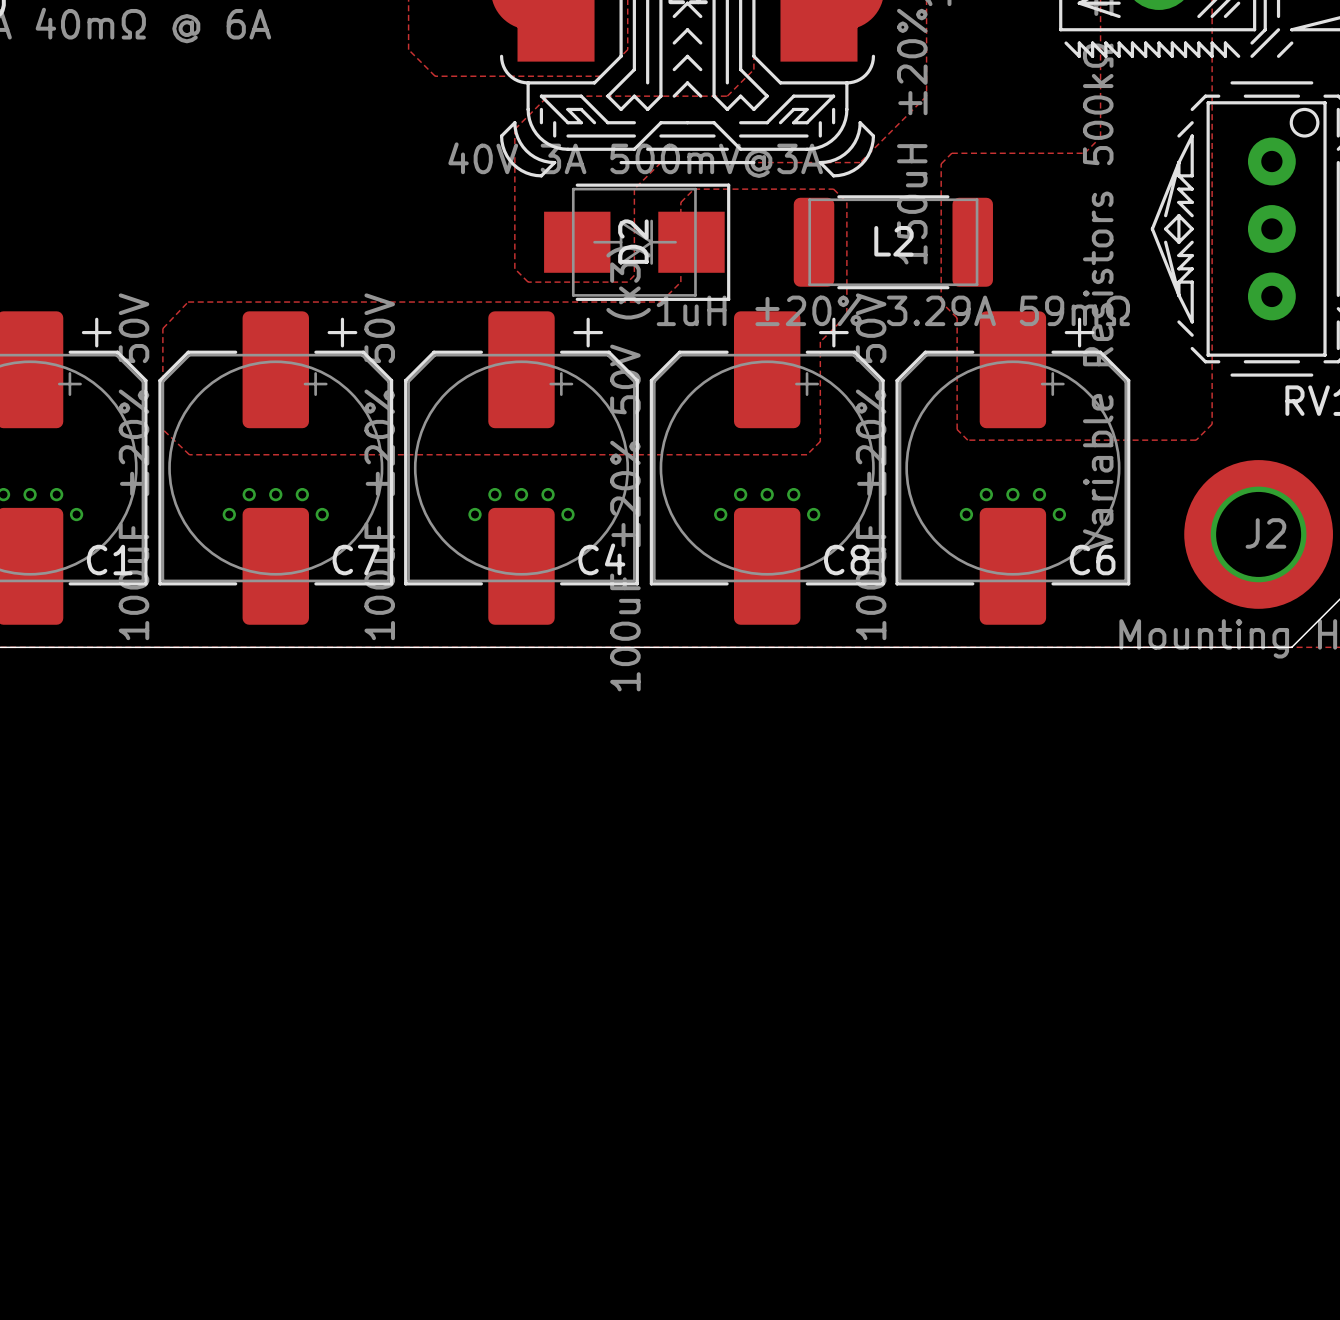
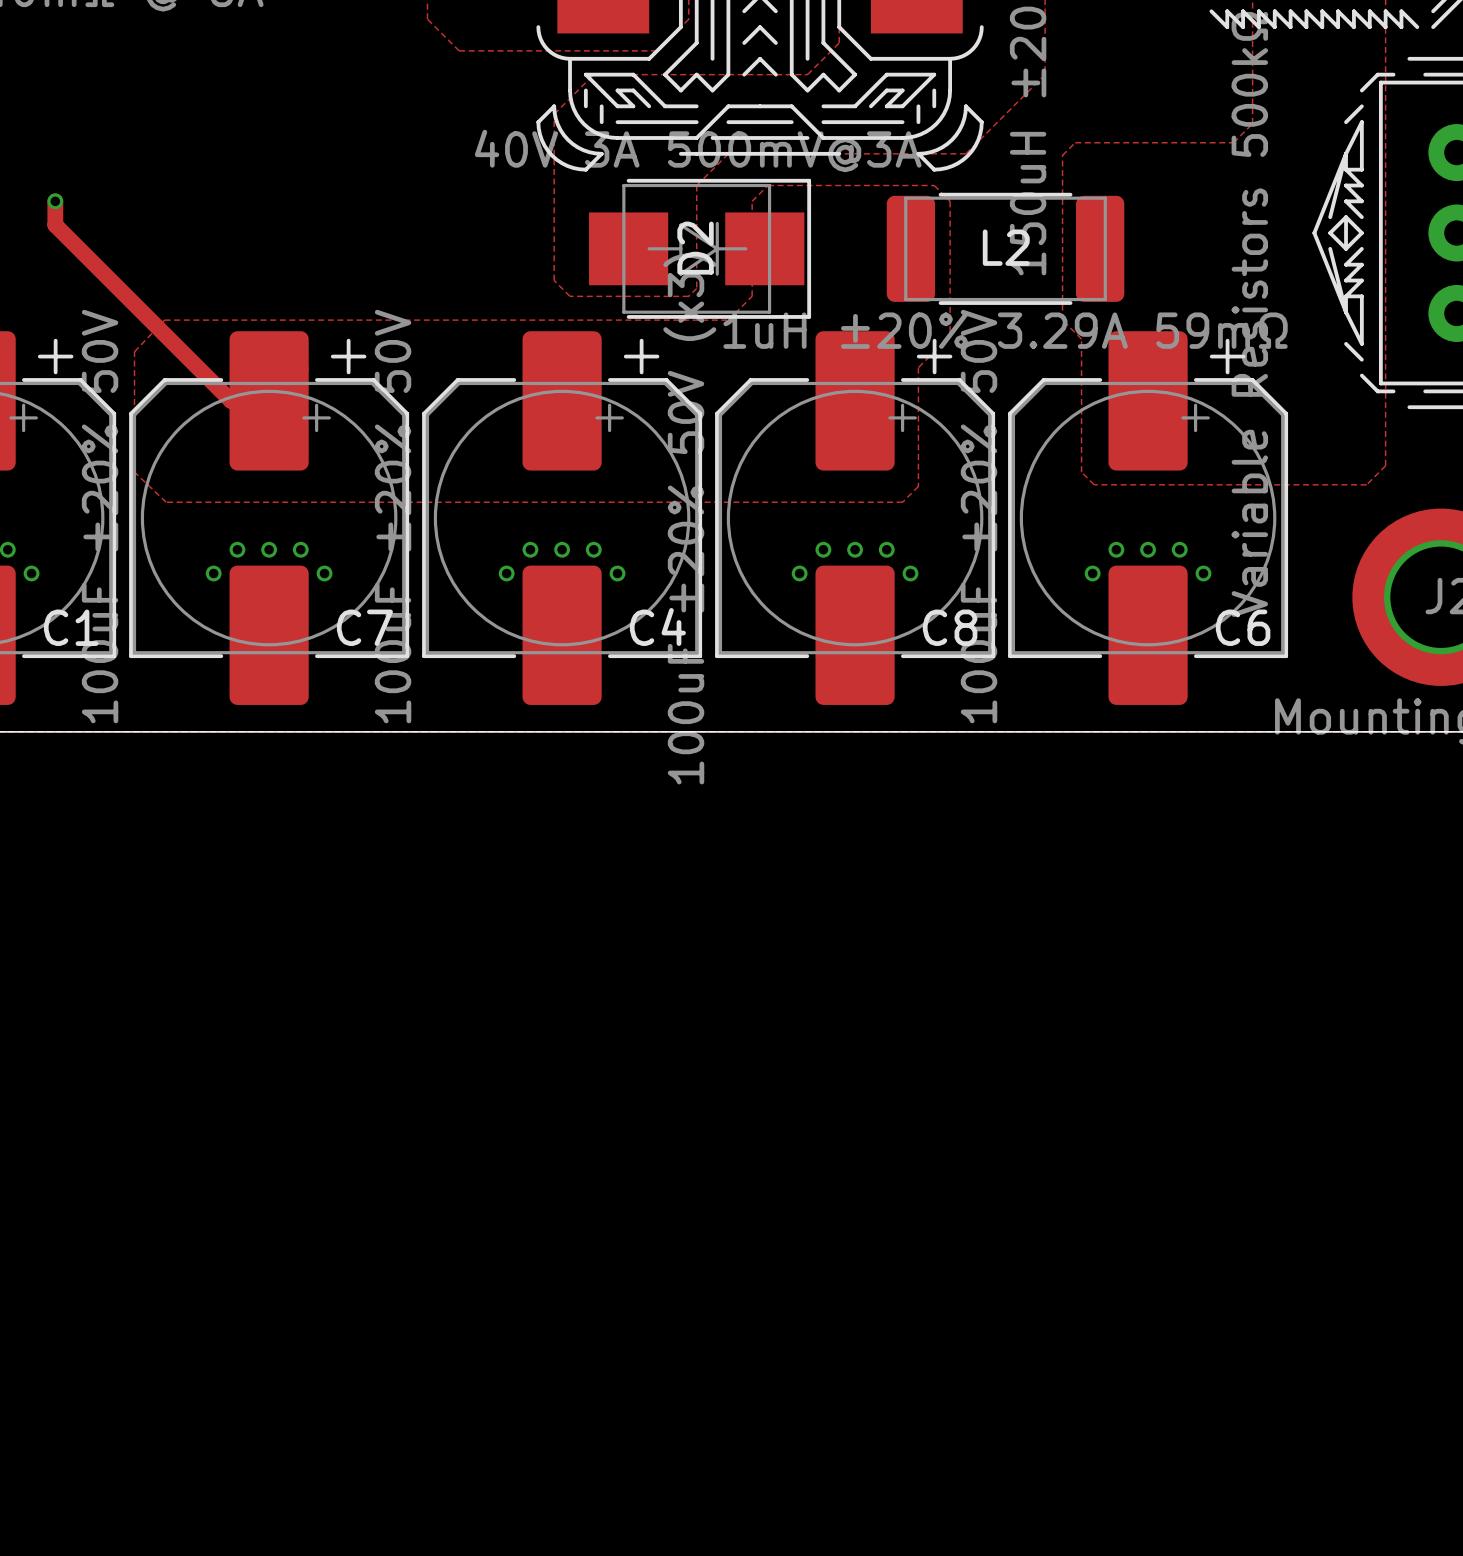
track: none -> (55, 201) (55, 225) (231, 400) (269, 400) (300, 369)
via: none -> (55, 201)

